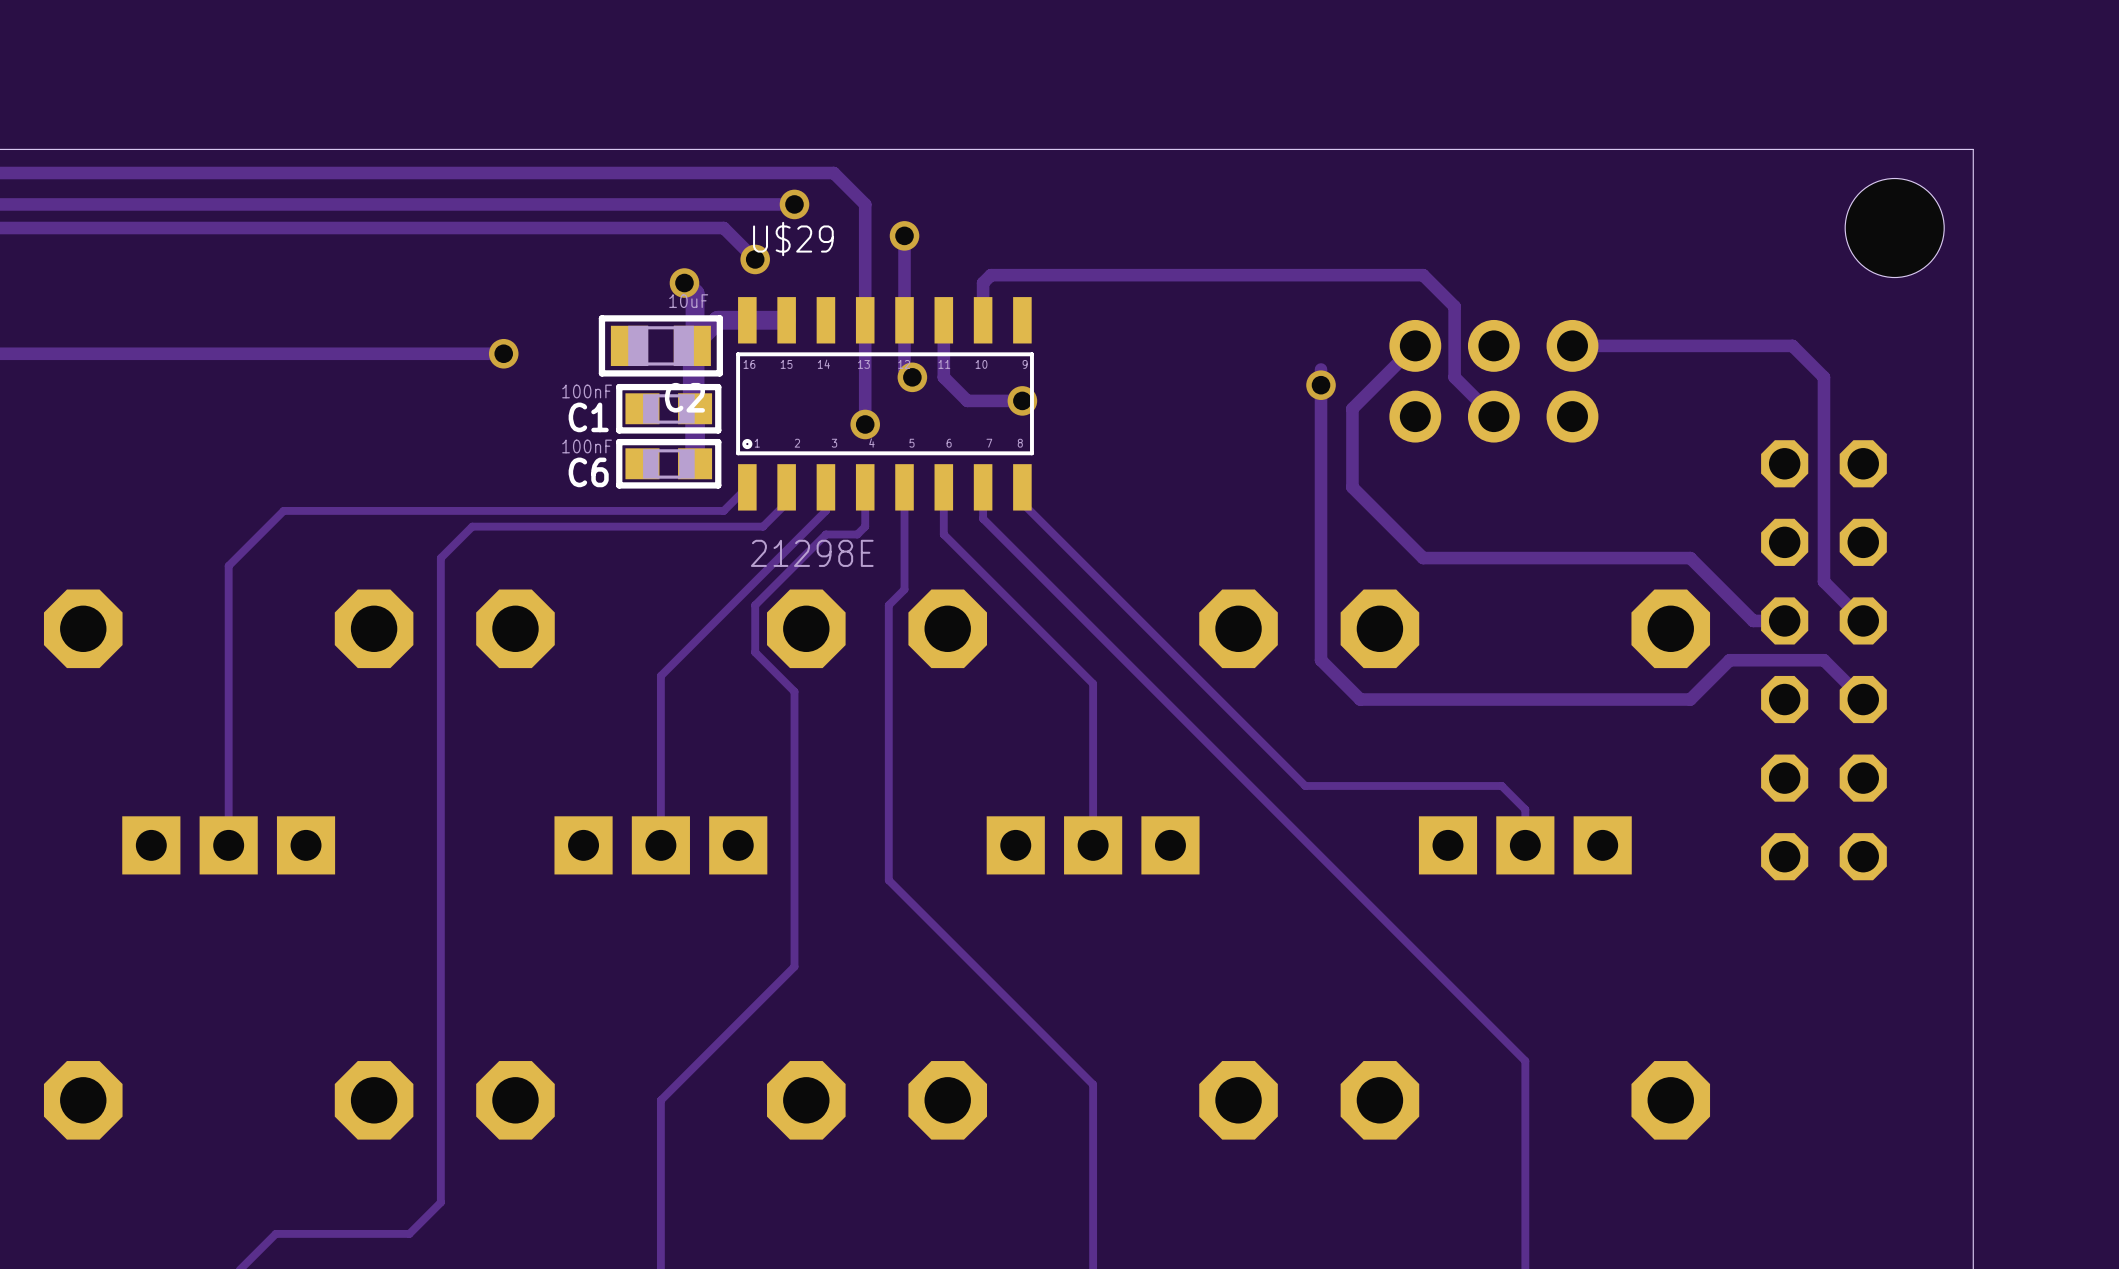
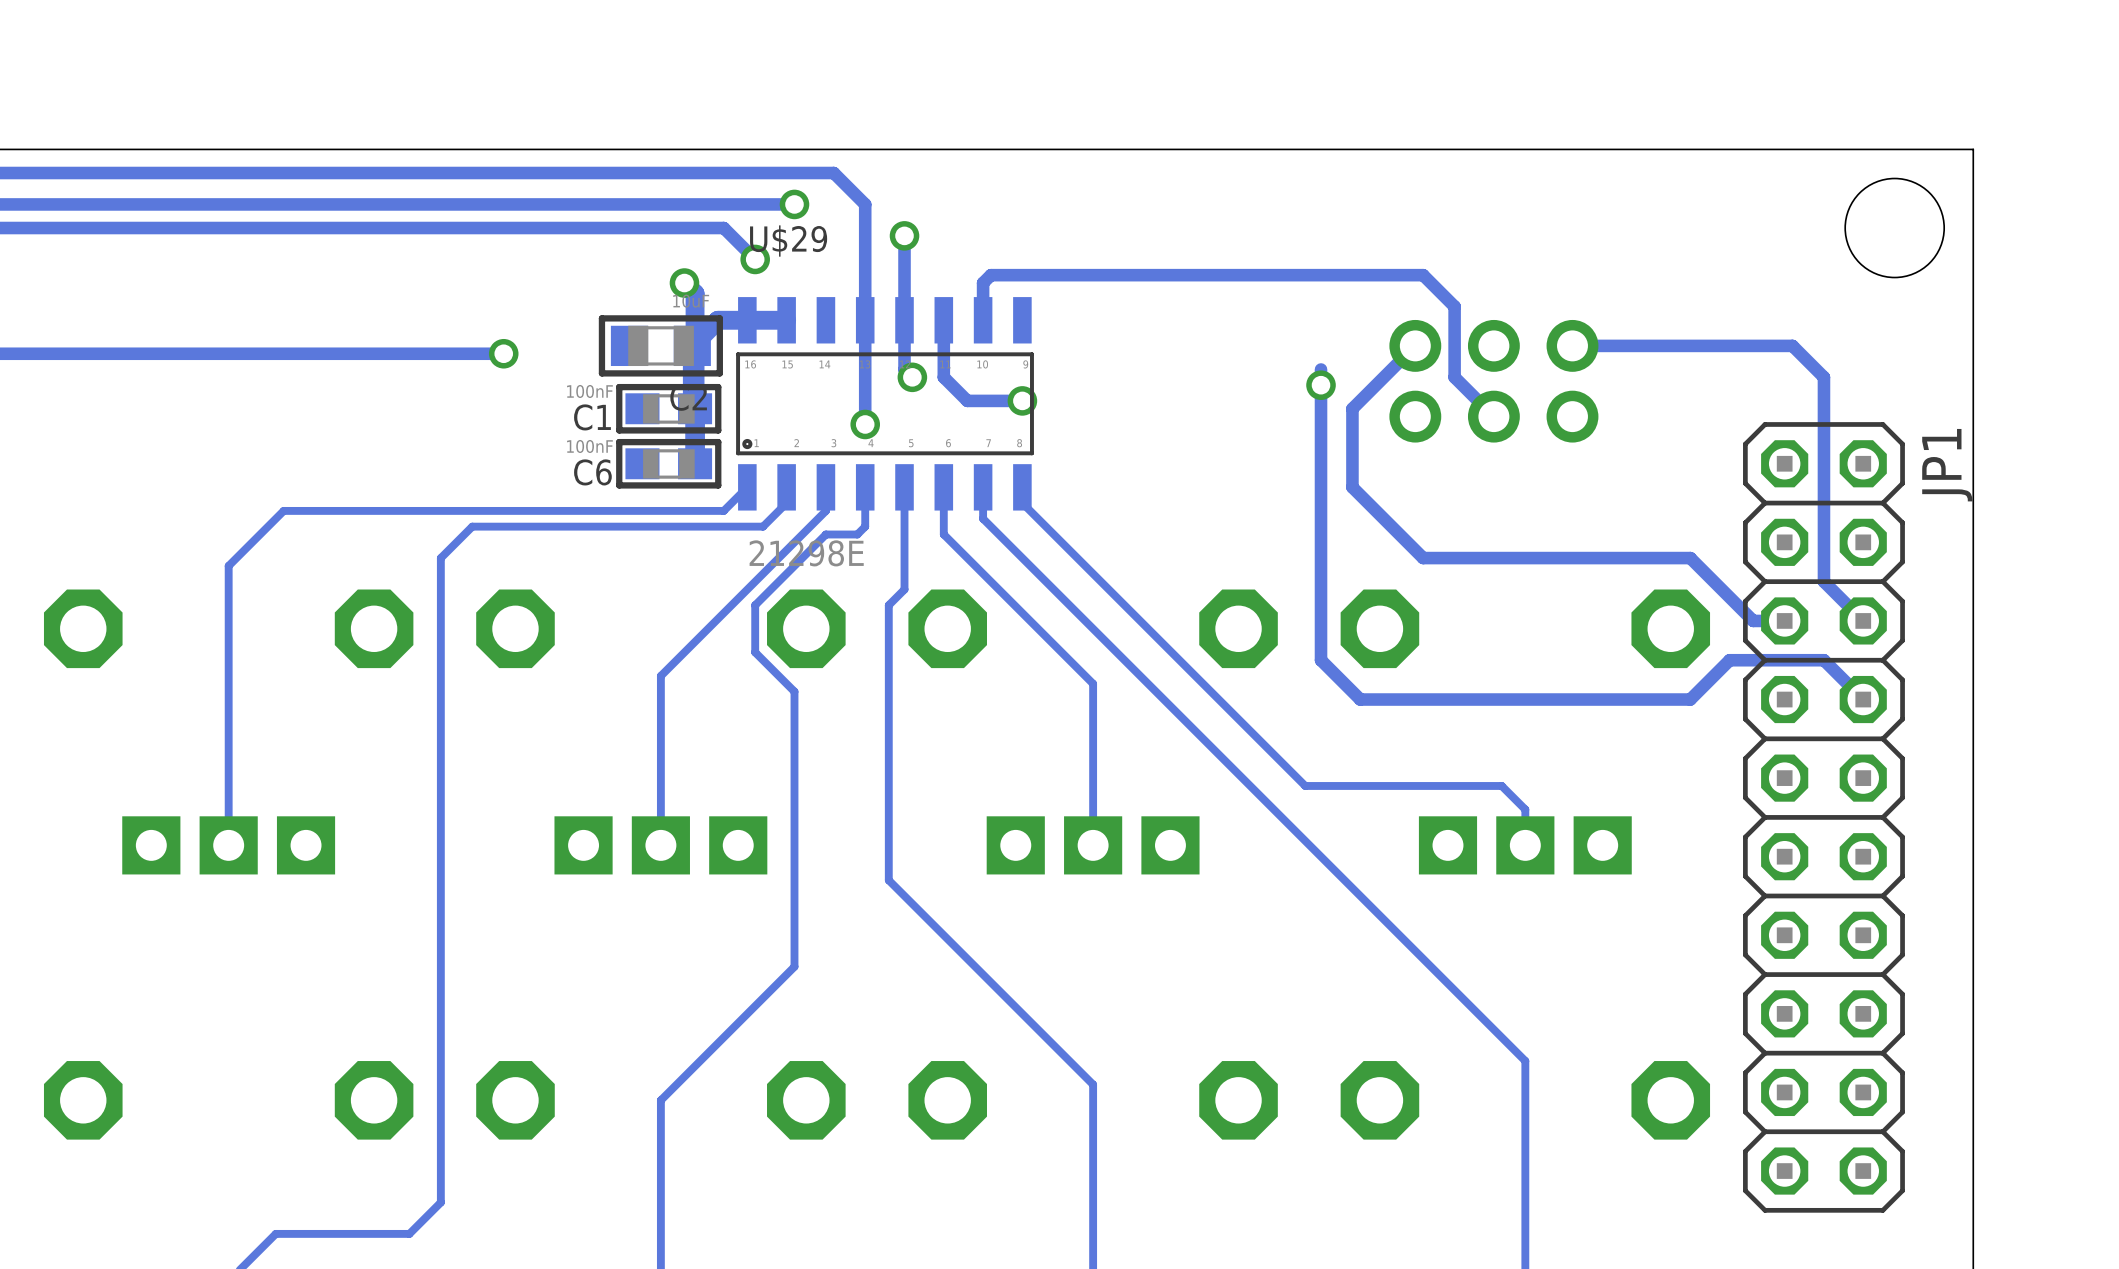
part: (1823, 660) -> none
JP1: none -> (1823, 817)

